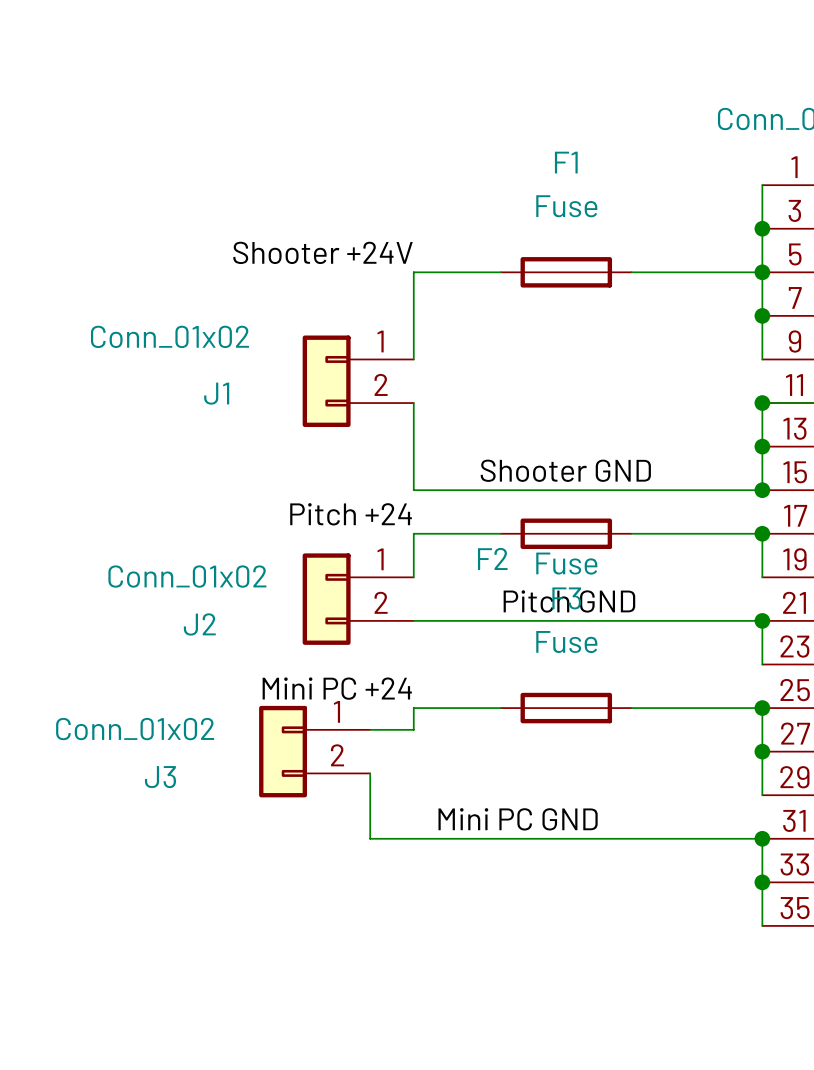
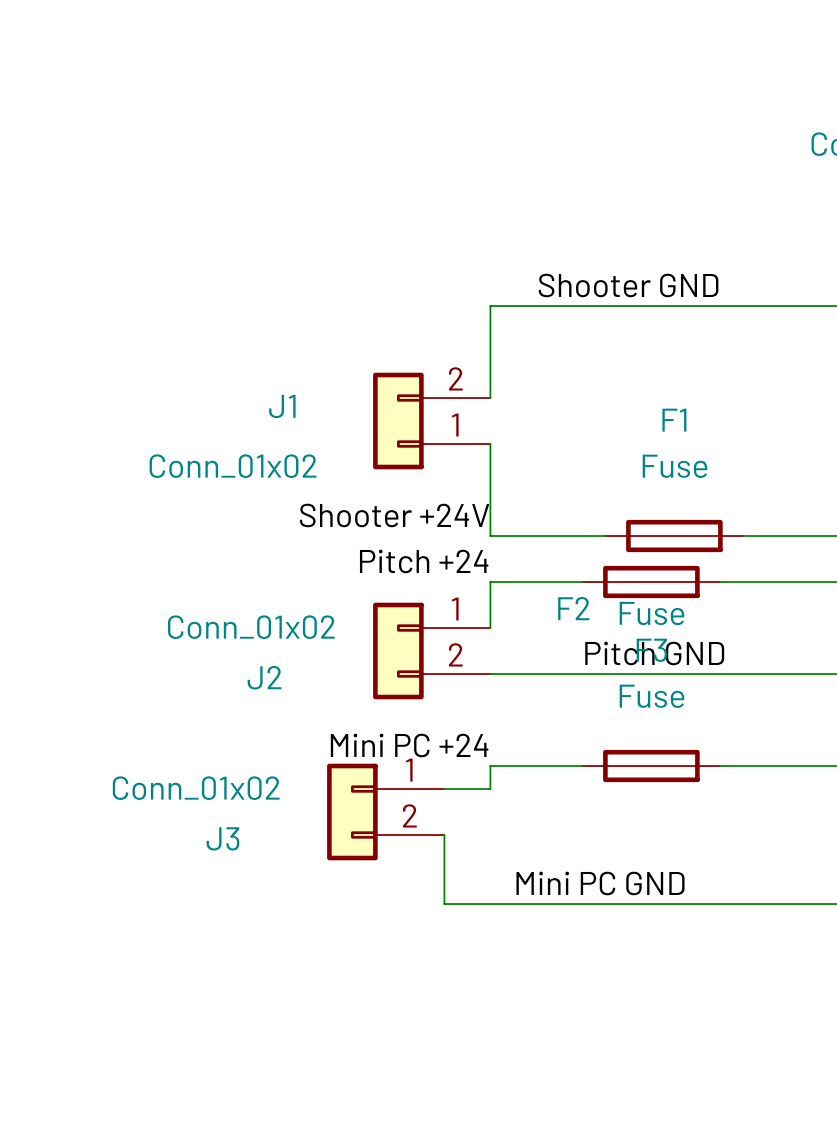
label position: Shooter +24V (323, 252) -> Shooter +24V (394, 515)
F1 position: (566, 272) -> (674, 536)
J1 flip: as is (326, 381) -> up-down (398, 421)
label position: Shooter GND (565, 470) -> Shooter GND (628, 285)

